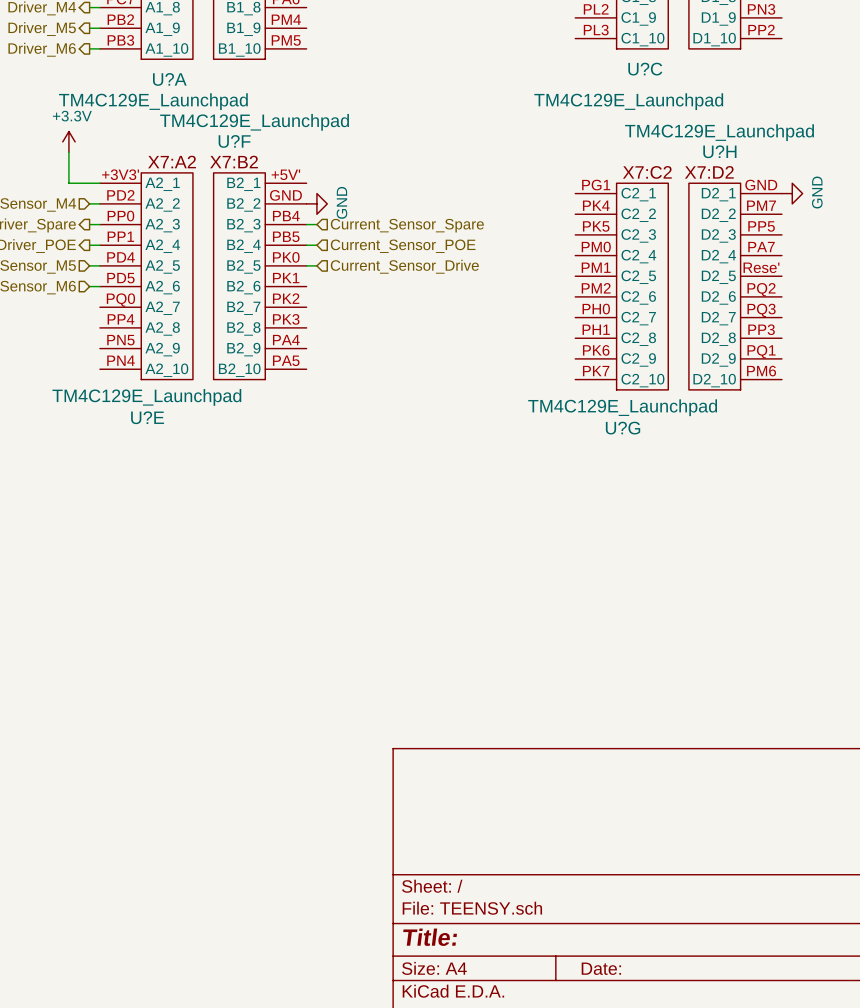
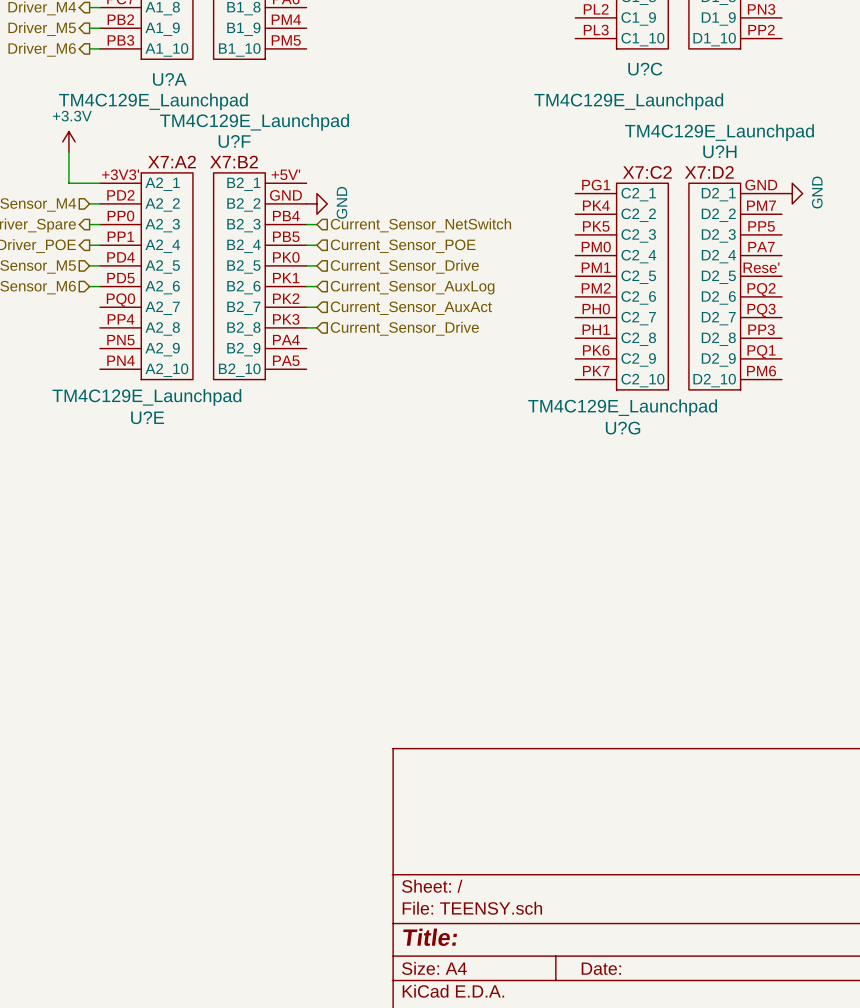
hierarchical label: Current_Sensor_Spare (407, 225) -> Current_Sensor_NetSwitch (420, 225)
wire: none -> (306, 286) (316, 286)
hierarchical label: none -> Current_Sensor_AuxLog (412, 287)
wire: none -> (306, 307) (316, 307)
hierarchical label: none -> Current_Sensor_AuxAct (411, 308)
wire: none -> (306, 327) (316, 327)
hierarchical label: none -> Current_Sensor_Drive (404, 328)

